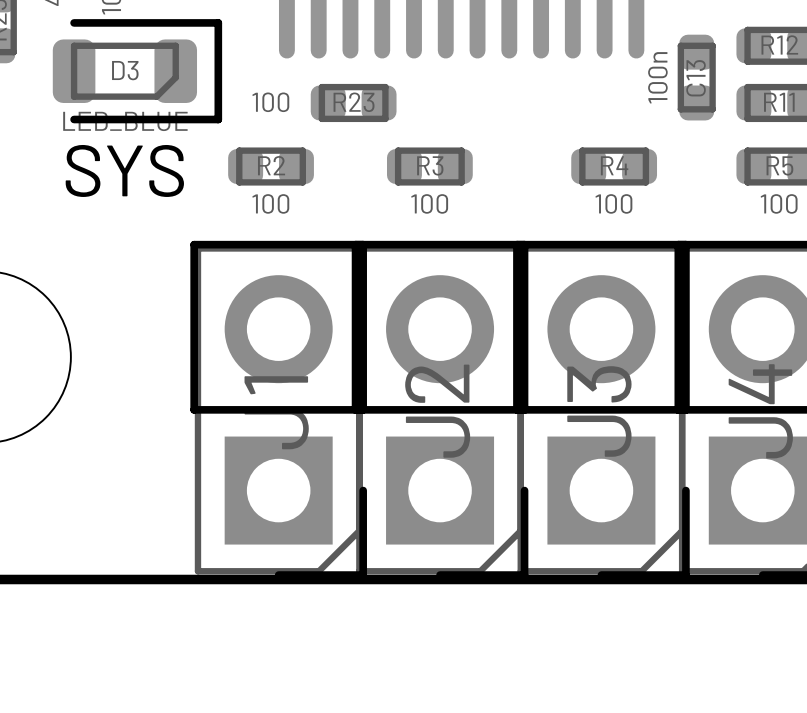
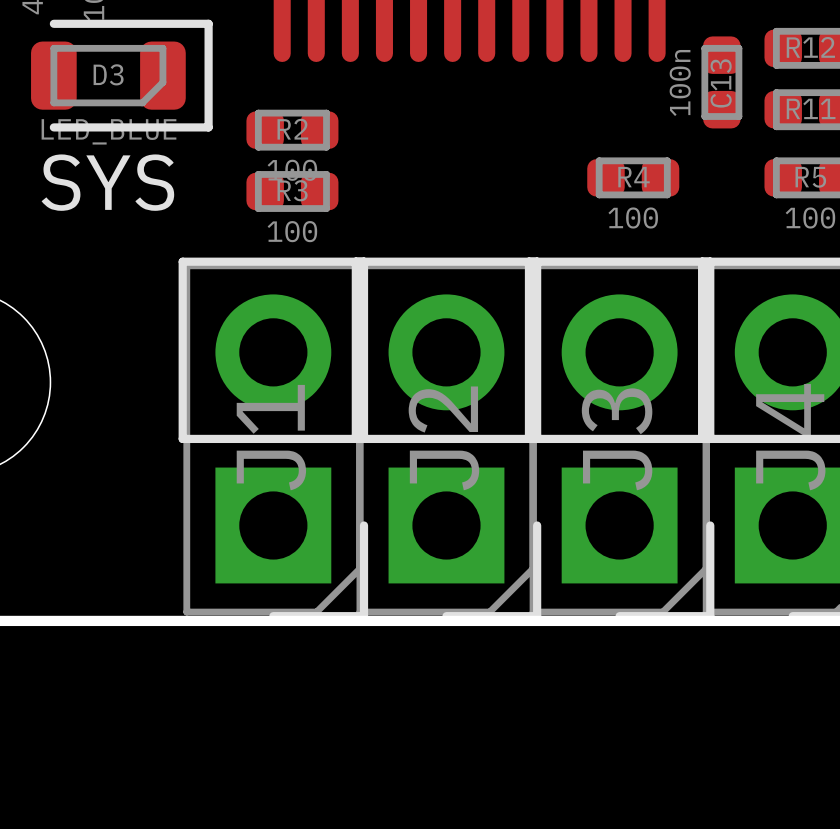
part: 100 (353, 102) -> none
R2 position: (271, 166) -> (292, 130)
R3 position: (429, 166) -> (292, 191)

